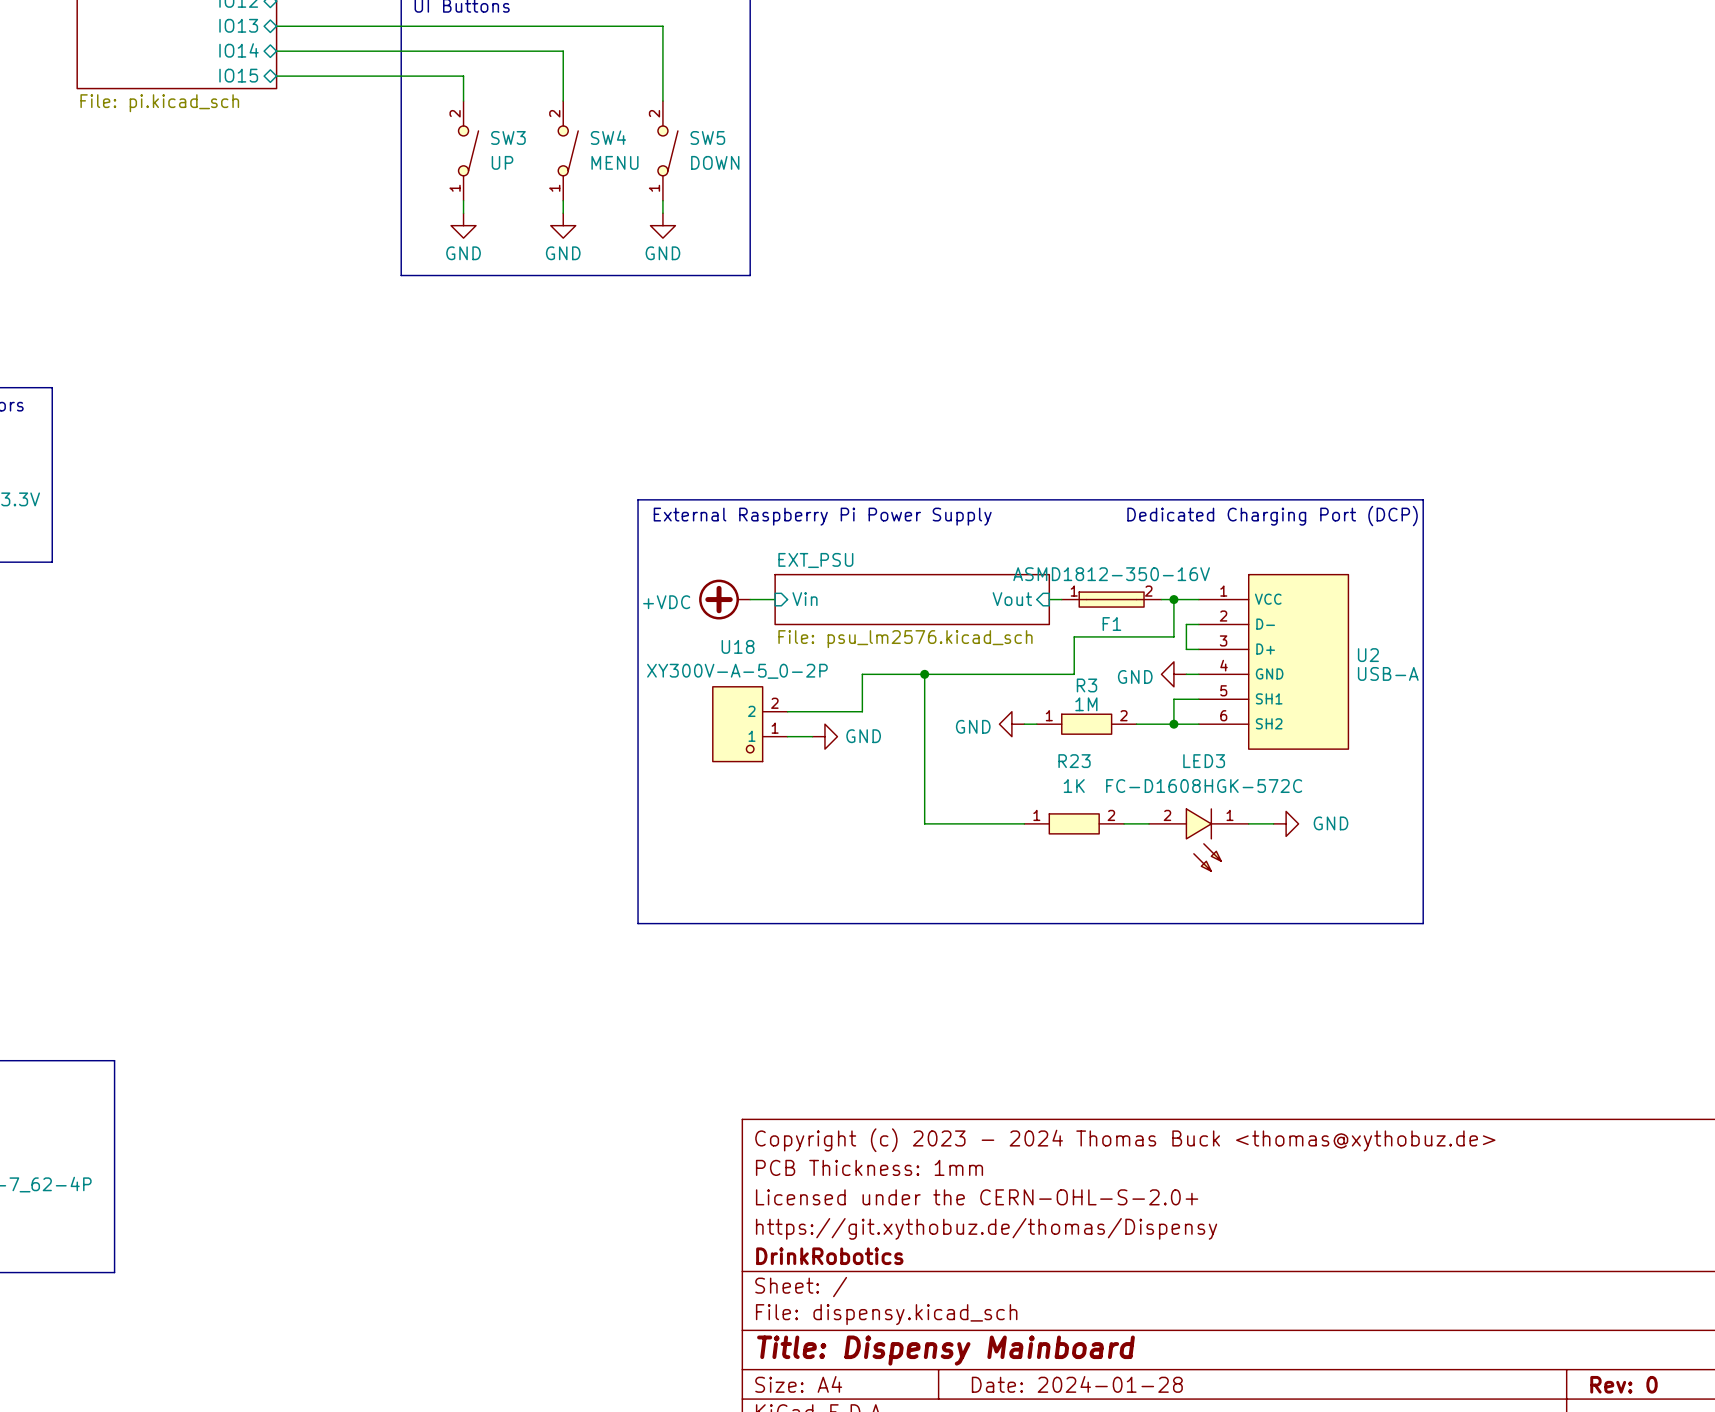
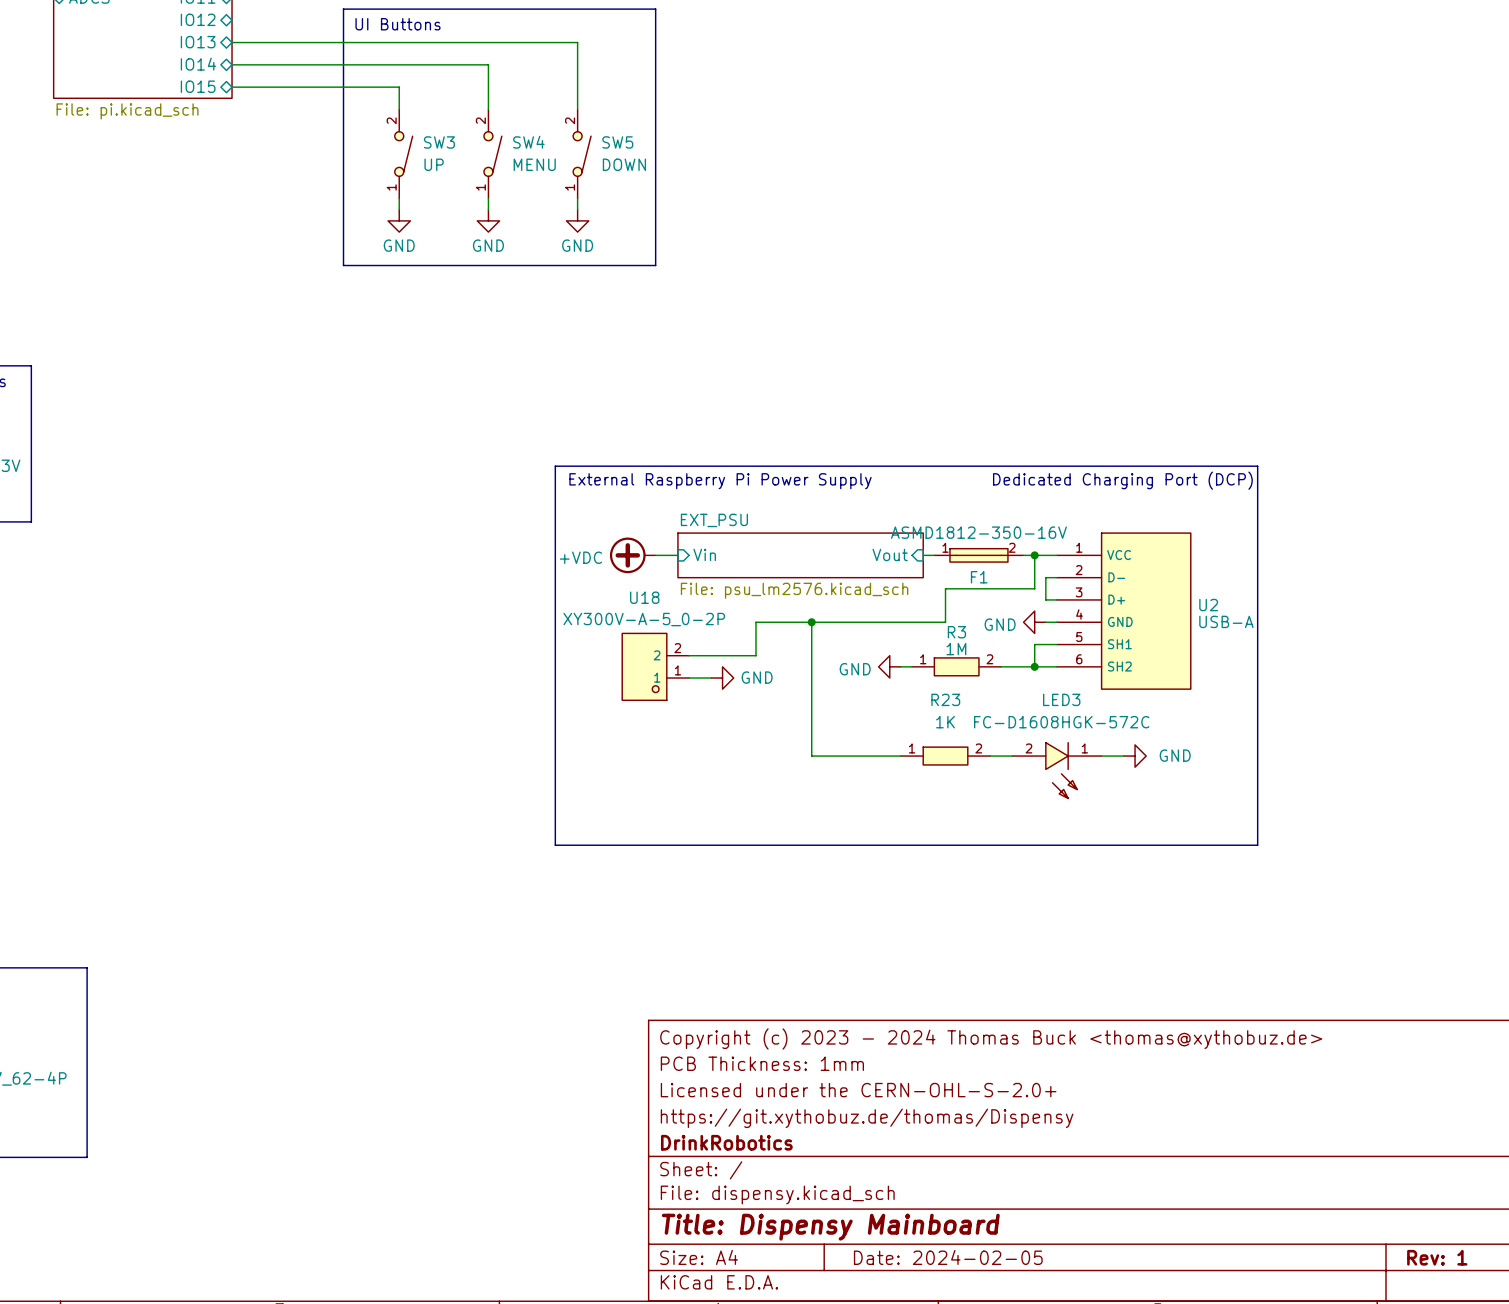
title block: Date: 2024-01-28 (1077, 1384) -> Date: 2024-02-05 (948, 1257)
title block: Rev: 0 (1623, 1384) -> Rev: 1 (1437, 1257)

